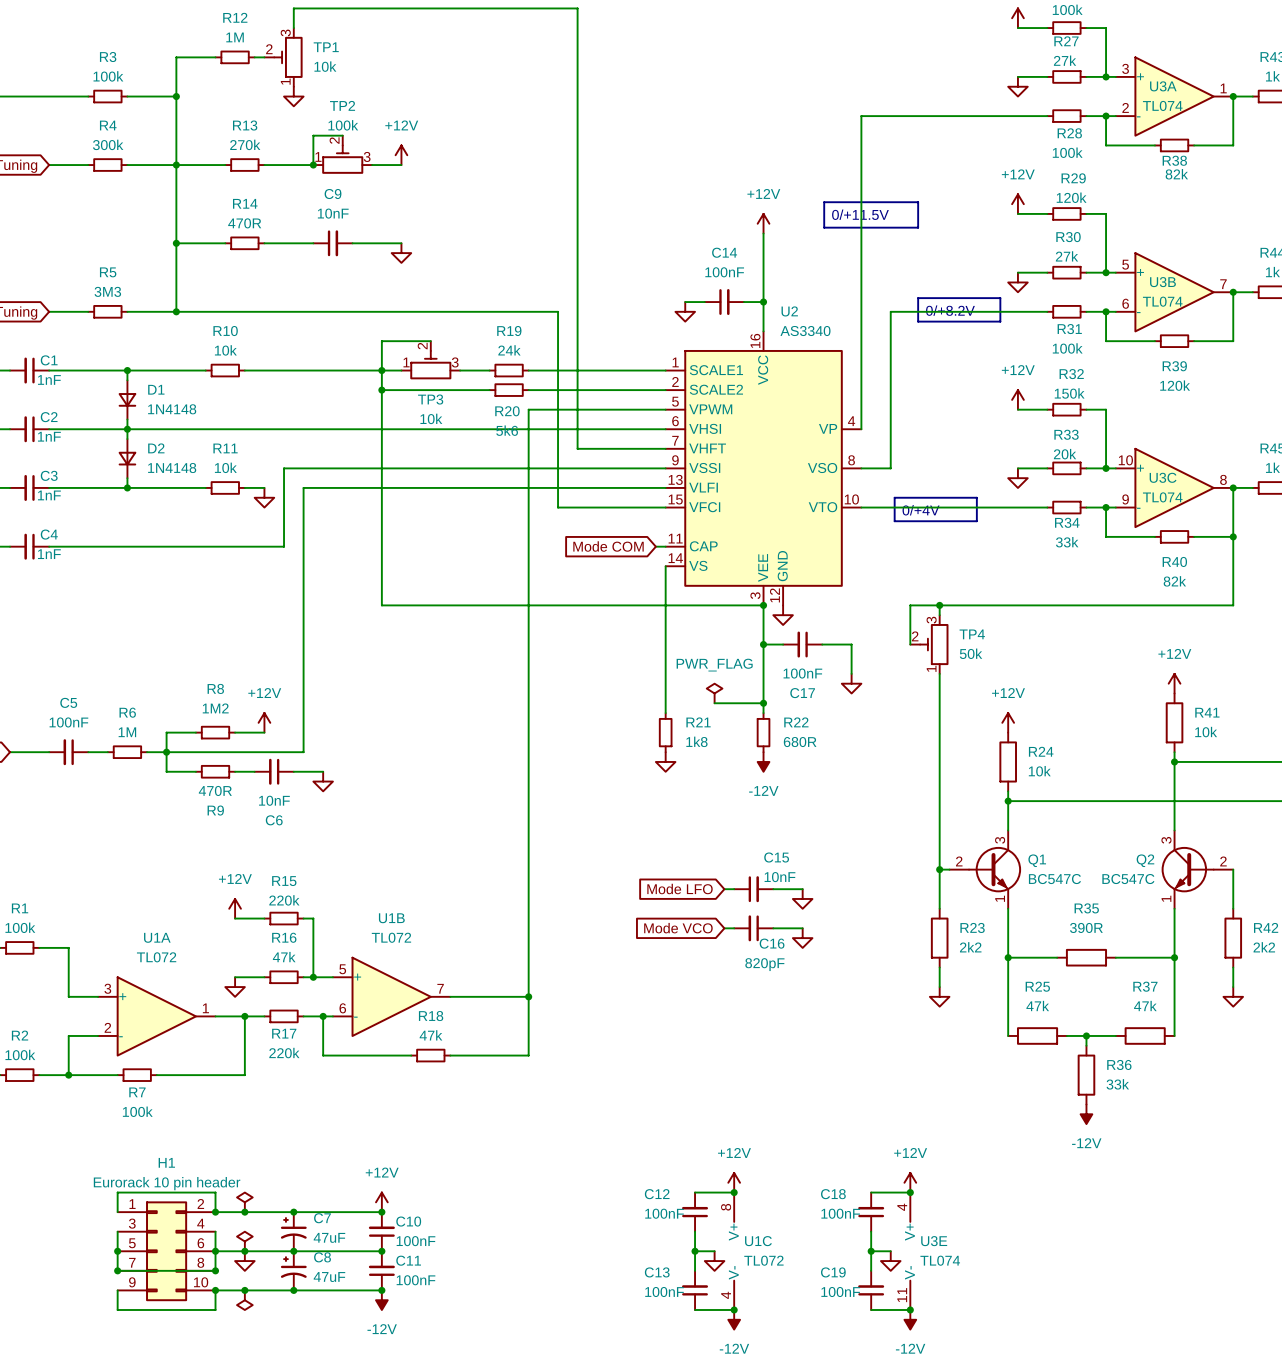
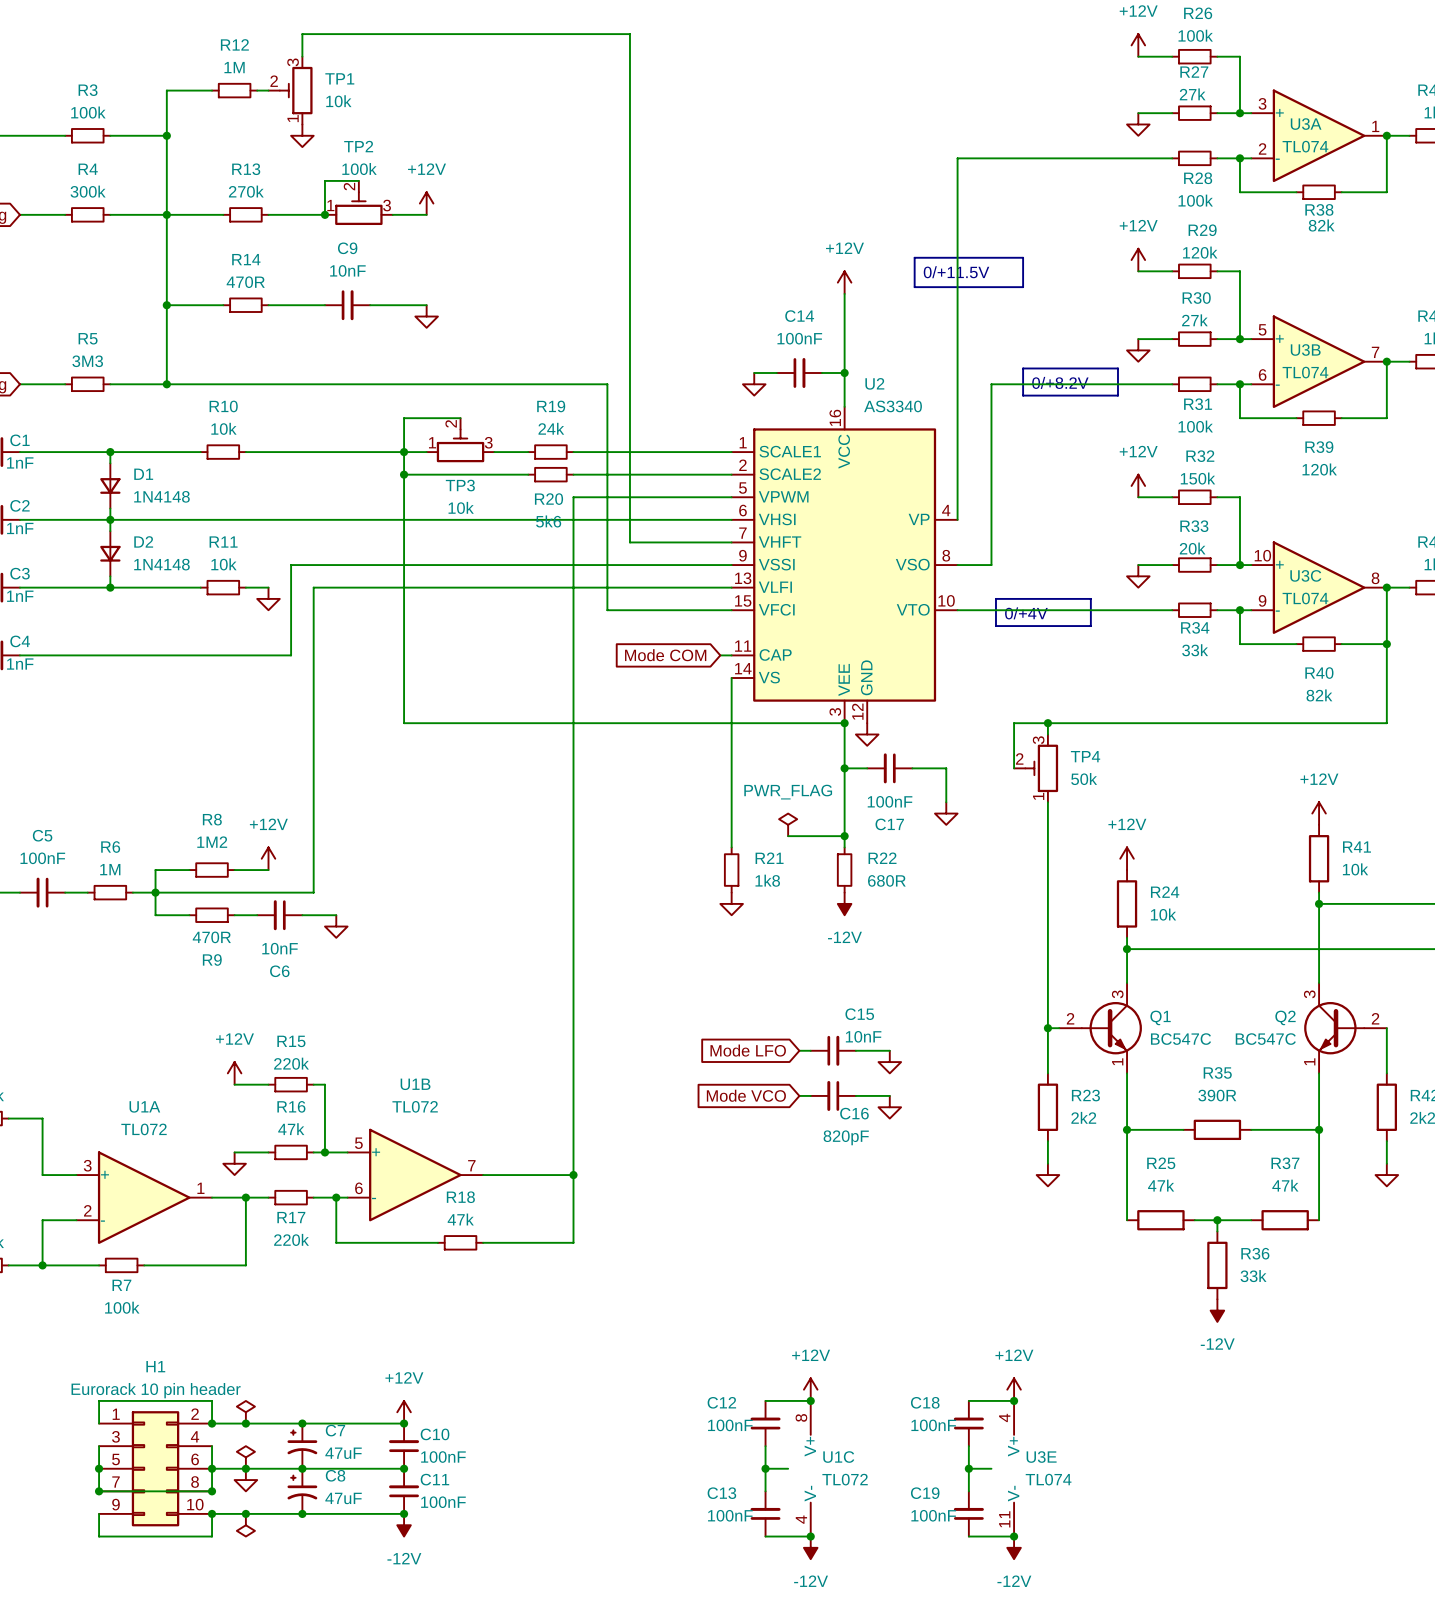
power symbol: (714, 1261) -> none
power symbol: (890, 1261) -> none

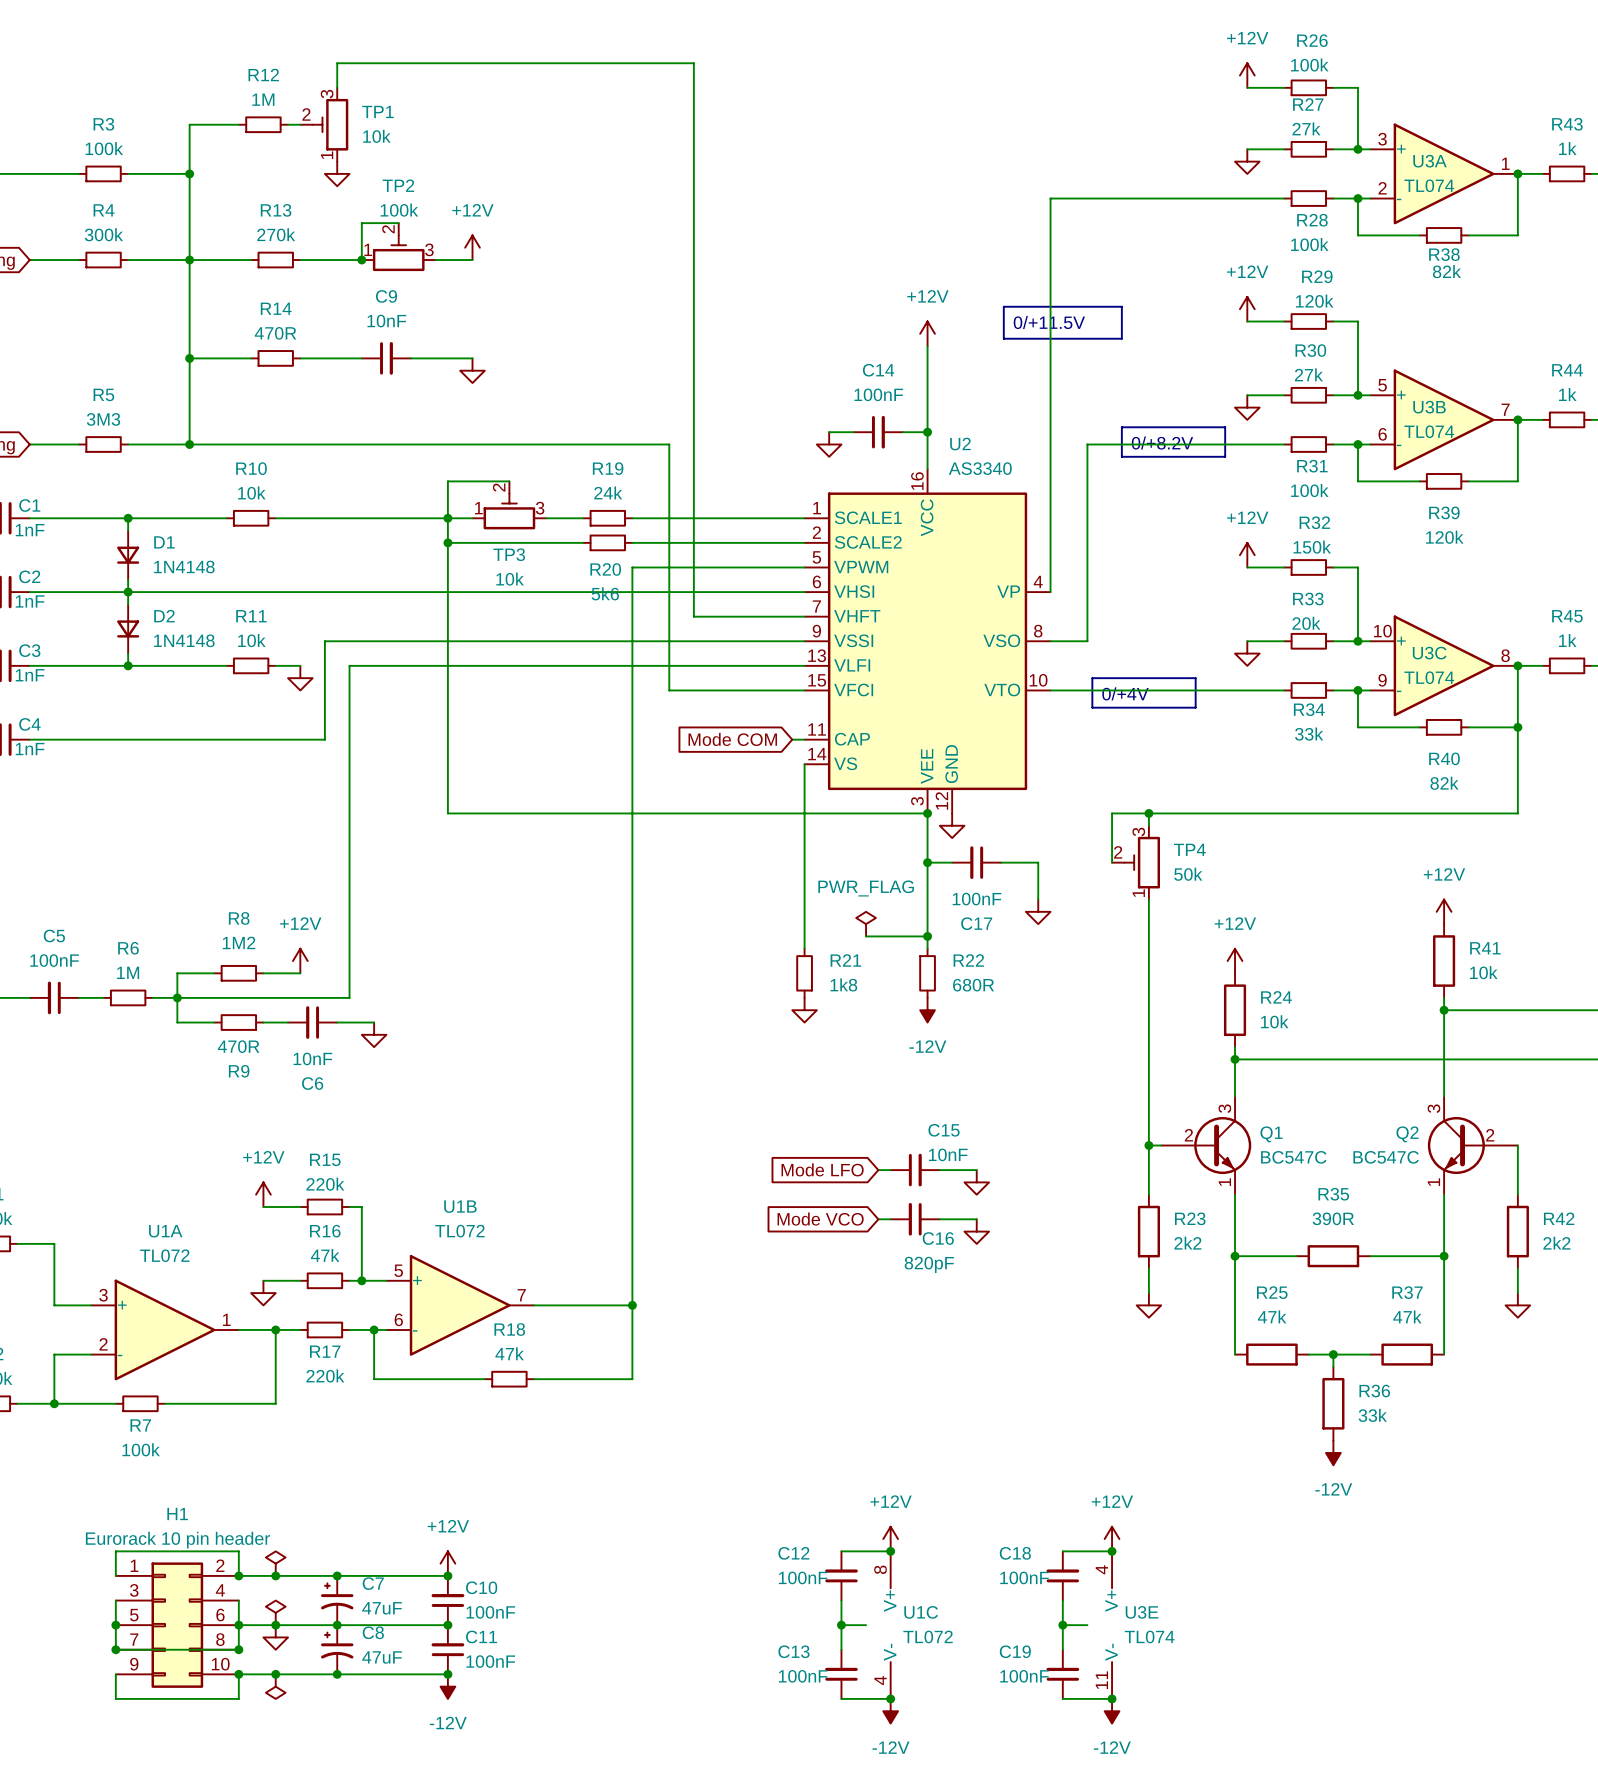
Q1 symbol: [1059, 983, 1142, 1074] -> [1161, 1096, 1252, 1195]
Q2 symbol: [1304, 983, 1387, 1074] -> [1427, 1096, 1518, 1195]

